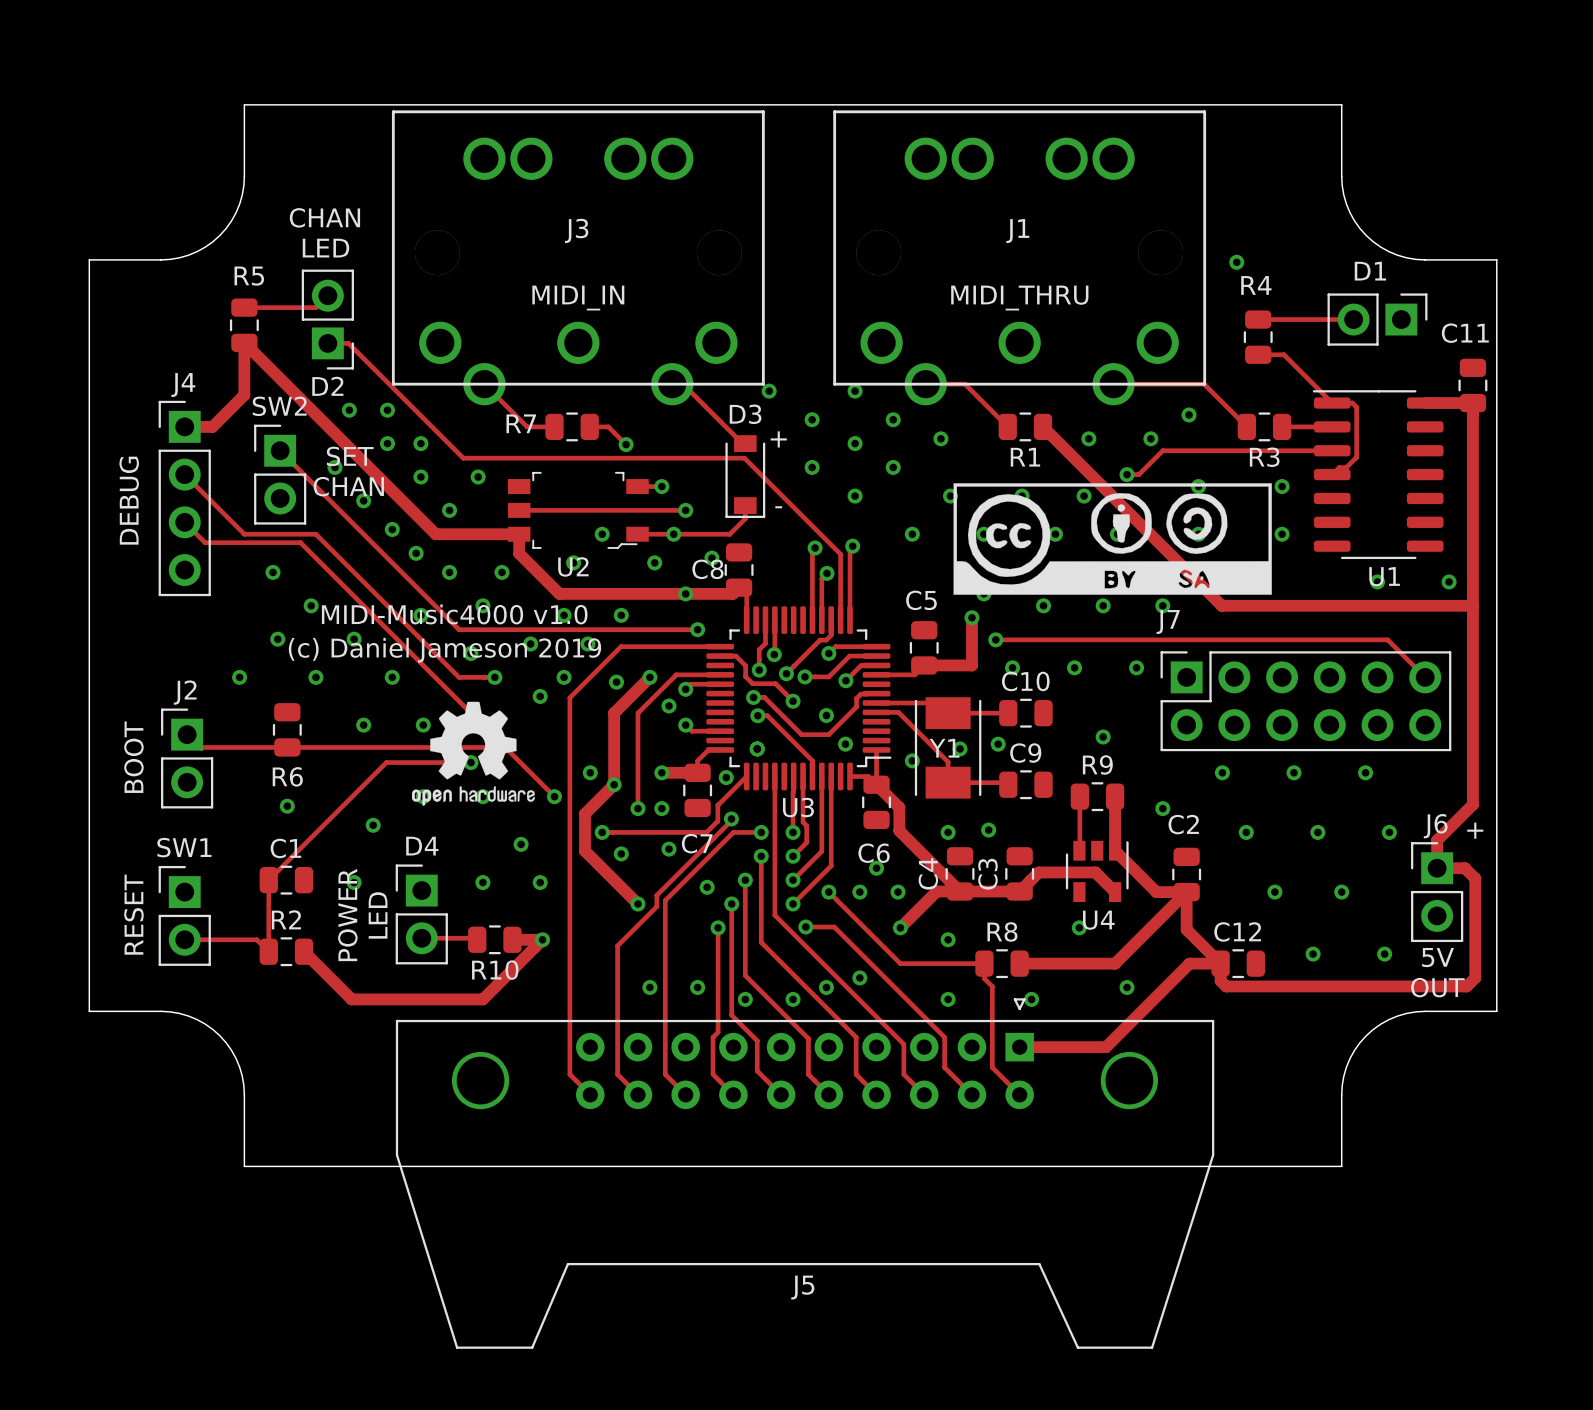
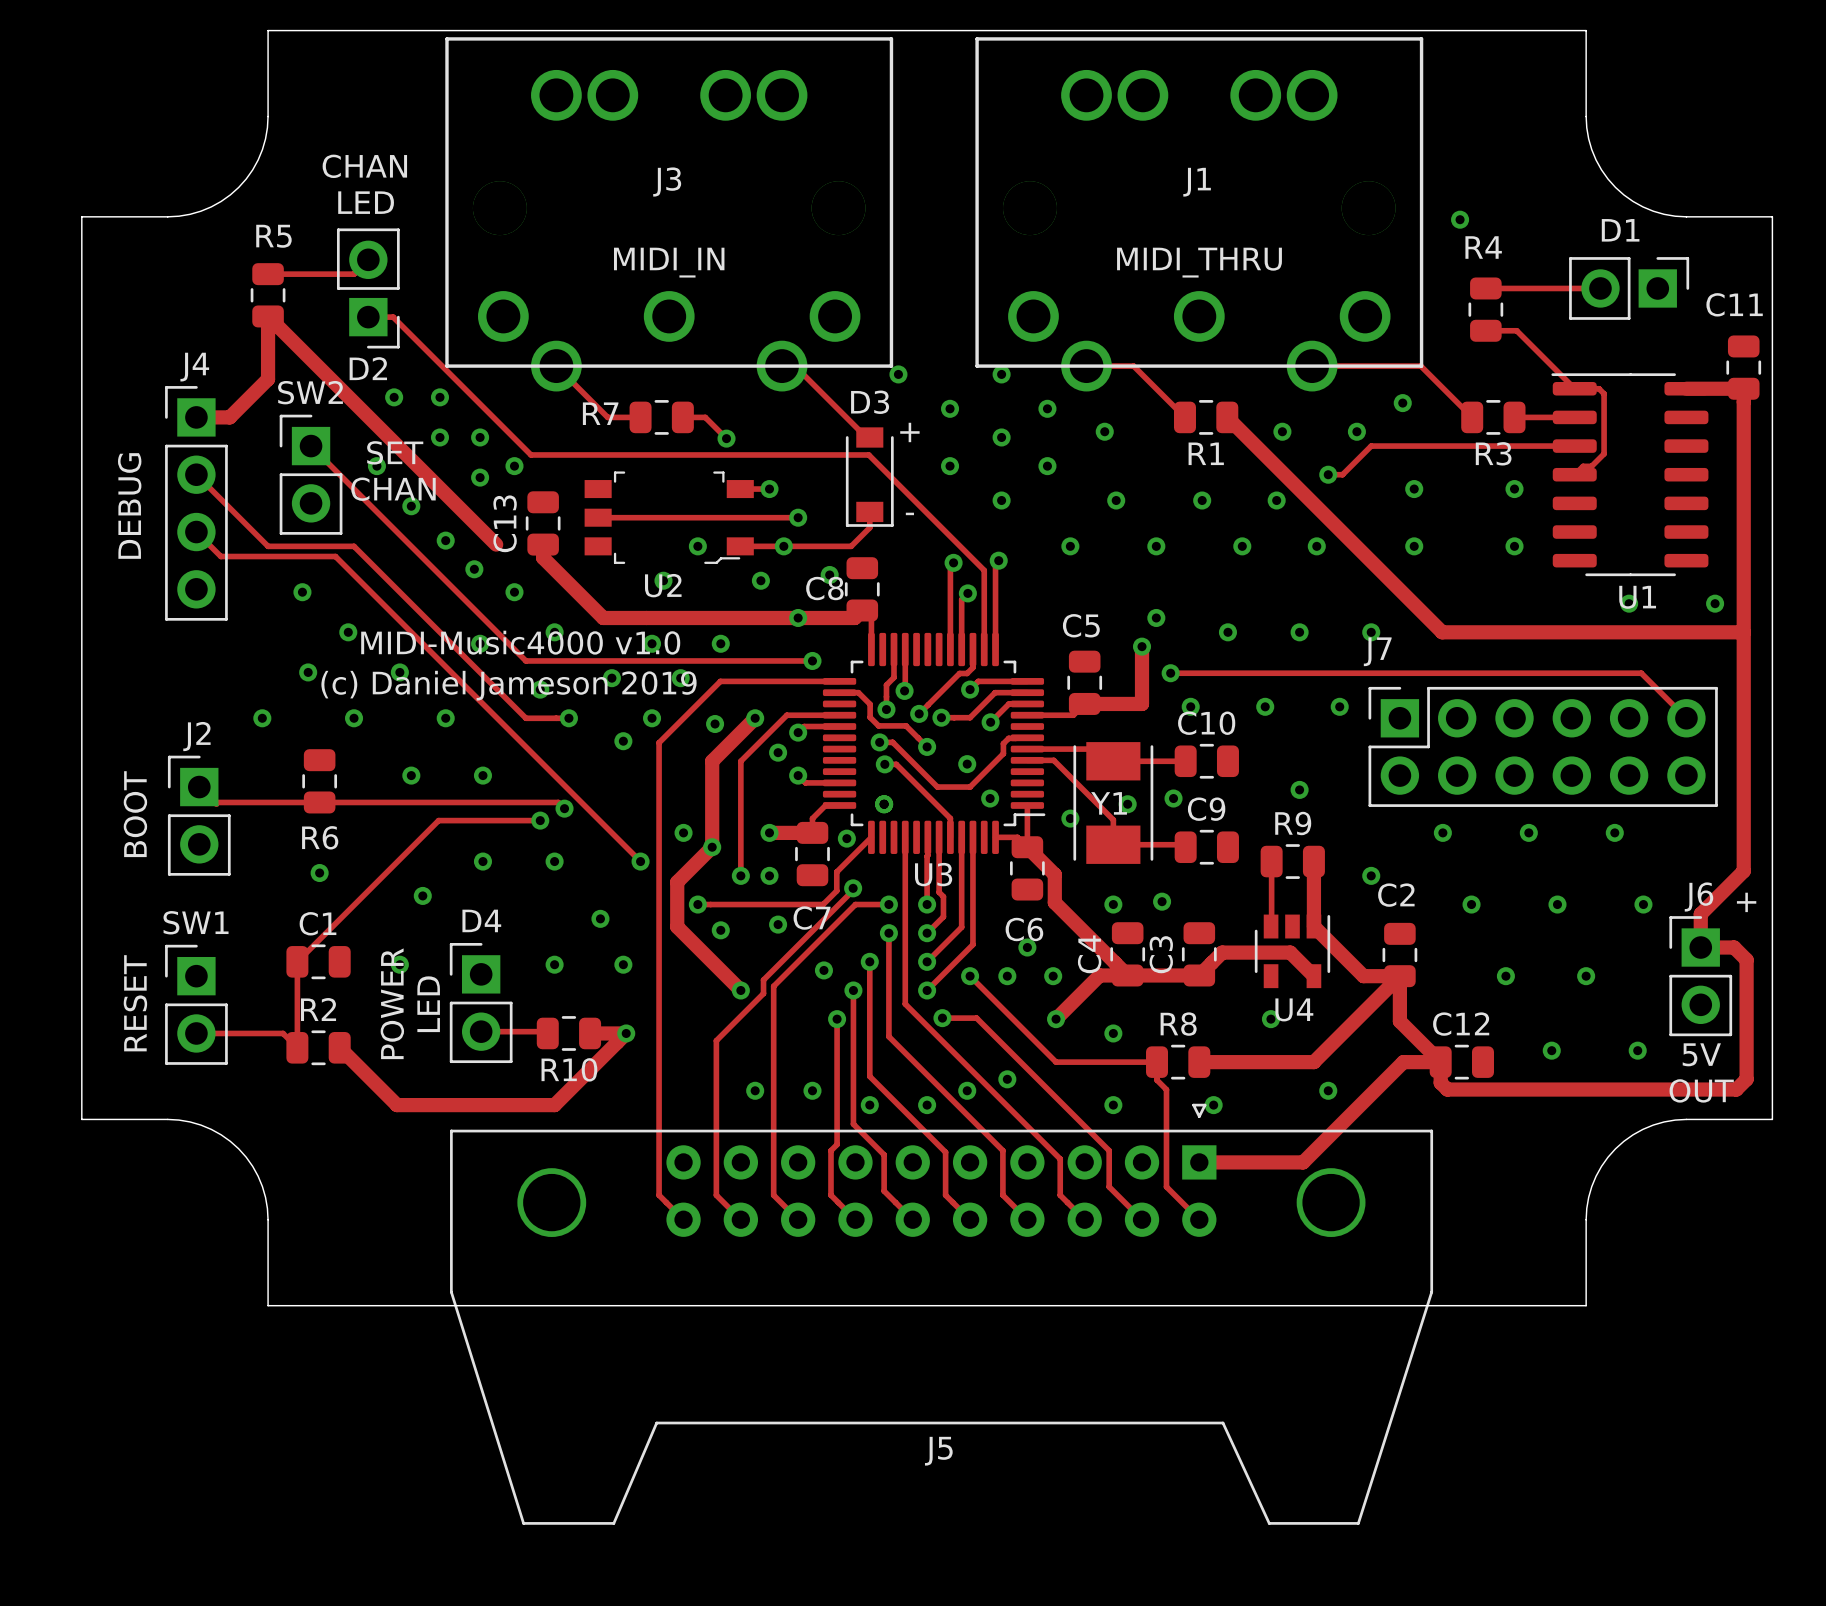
via: none -> (514, 466)
via: (478, 477) -> none
drawing: [953, 483, 1272, 595] -> none
via: (449, 510) -> none
C13: none -> (543, 523)
track: (434, 532) (519, 534) (519, 553) (559, 593) -> (543, 544) (543, 557) (603, 617) (646, 617)
via: (502, 572) -> none
drawing: [411, 701, 535, 806] -> none

